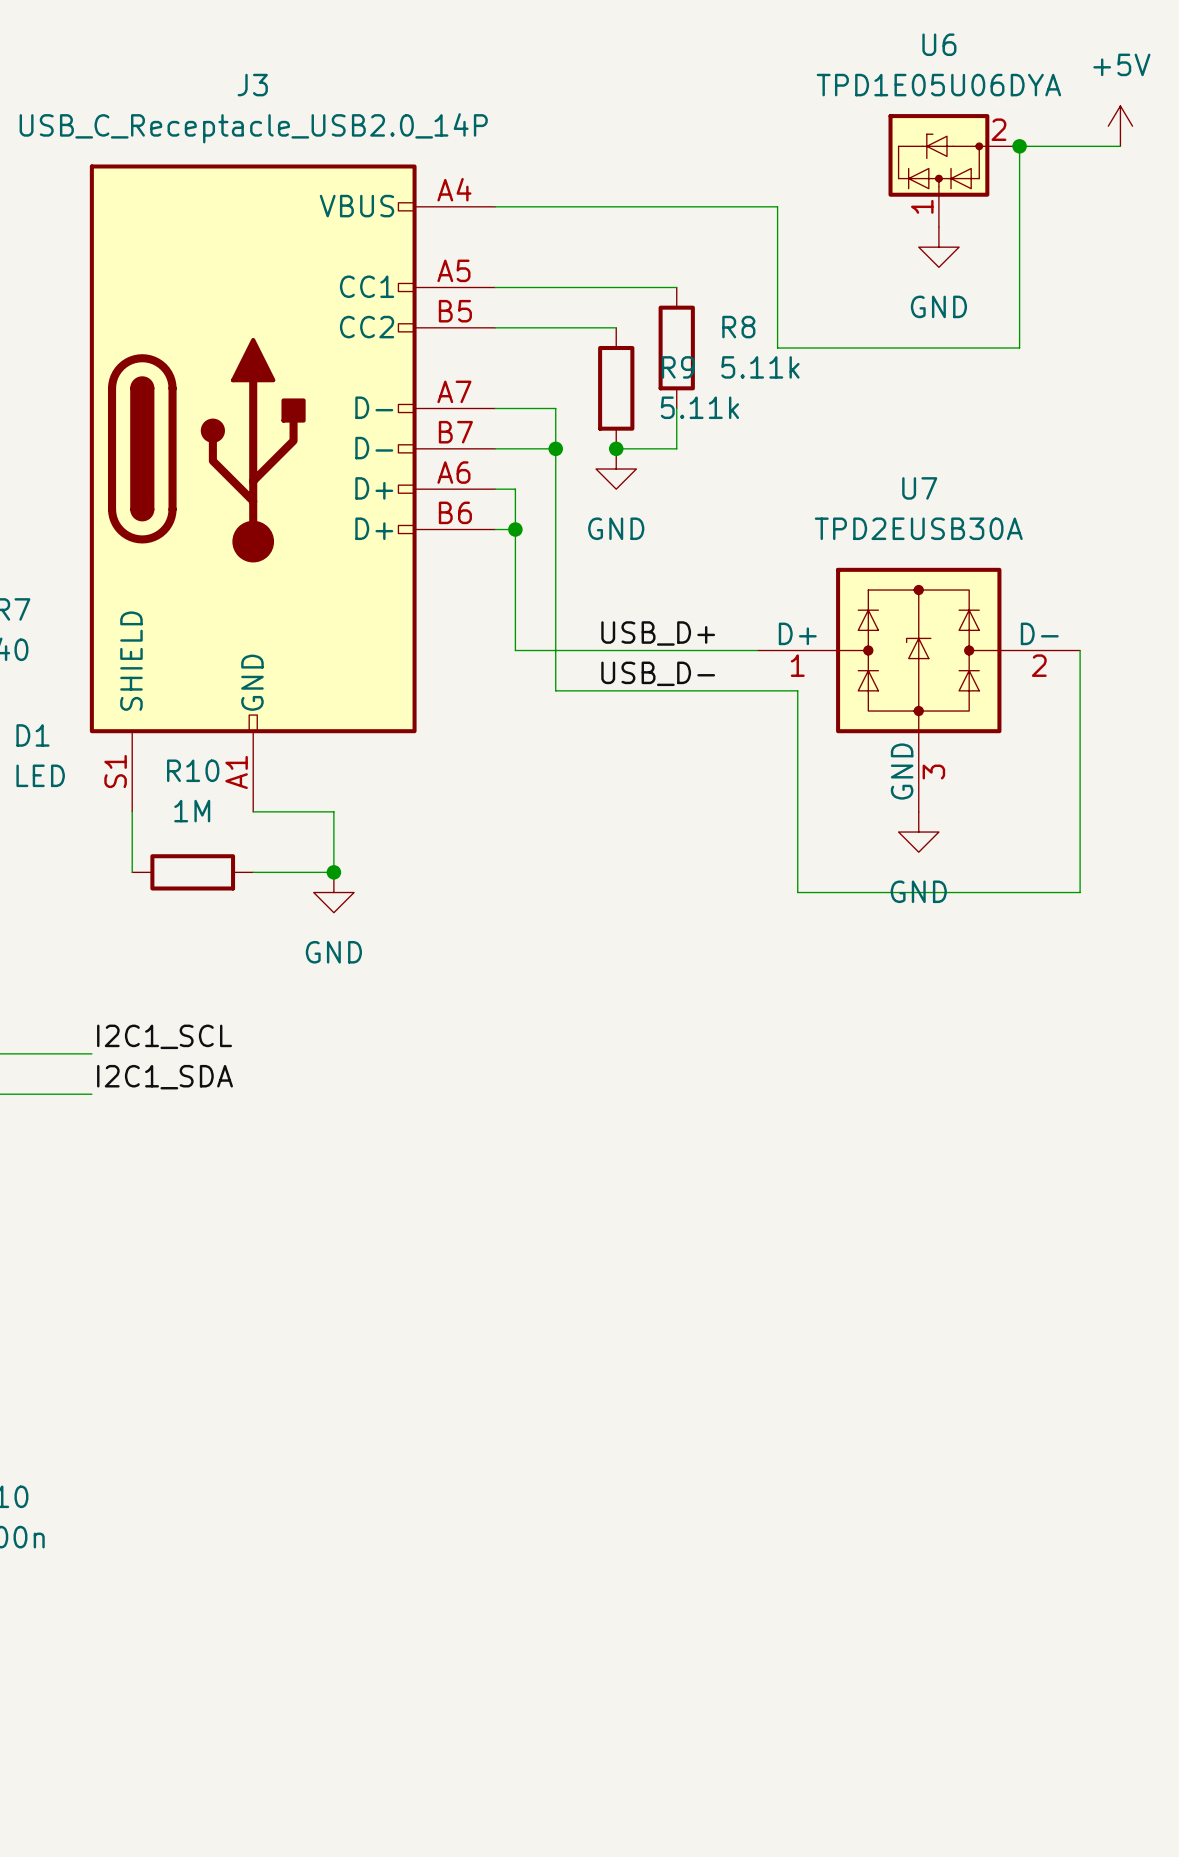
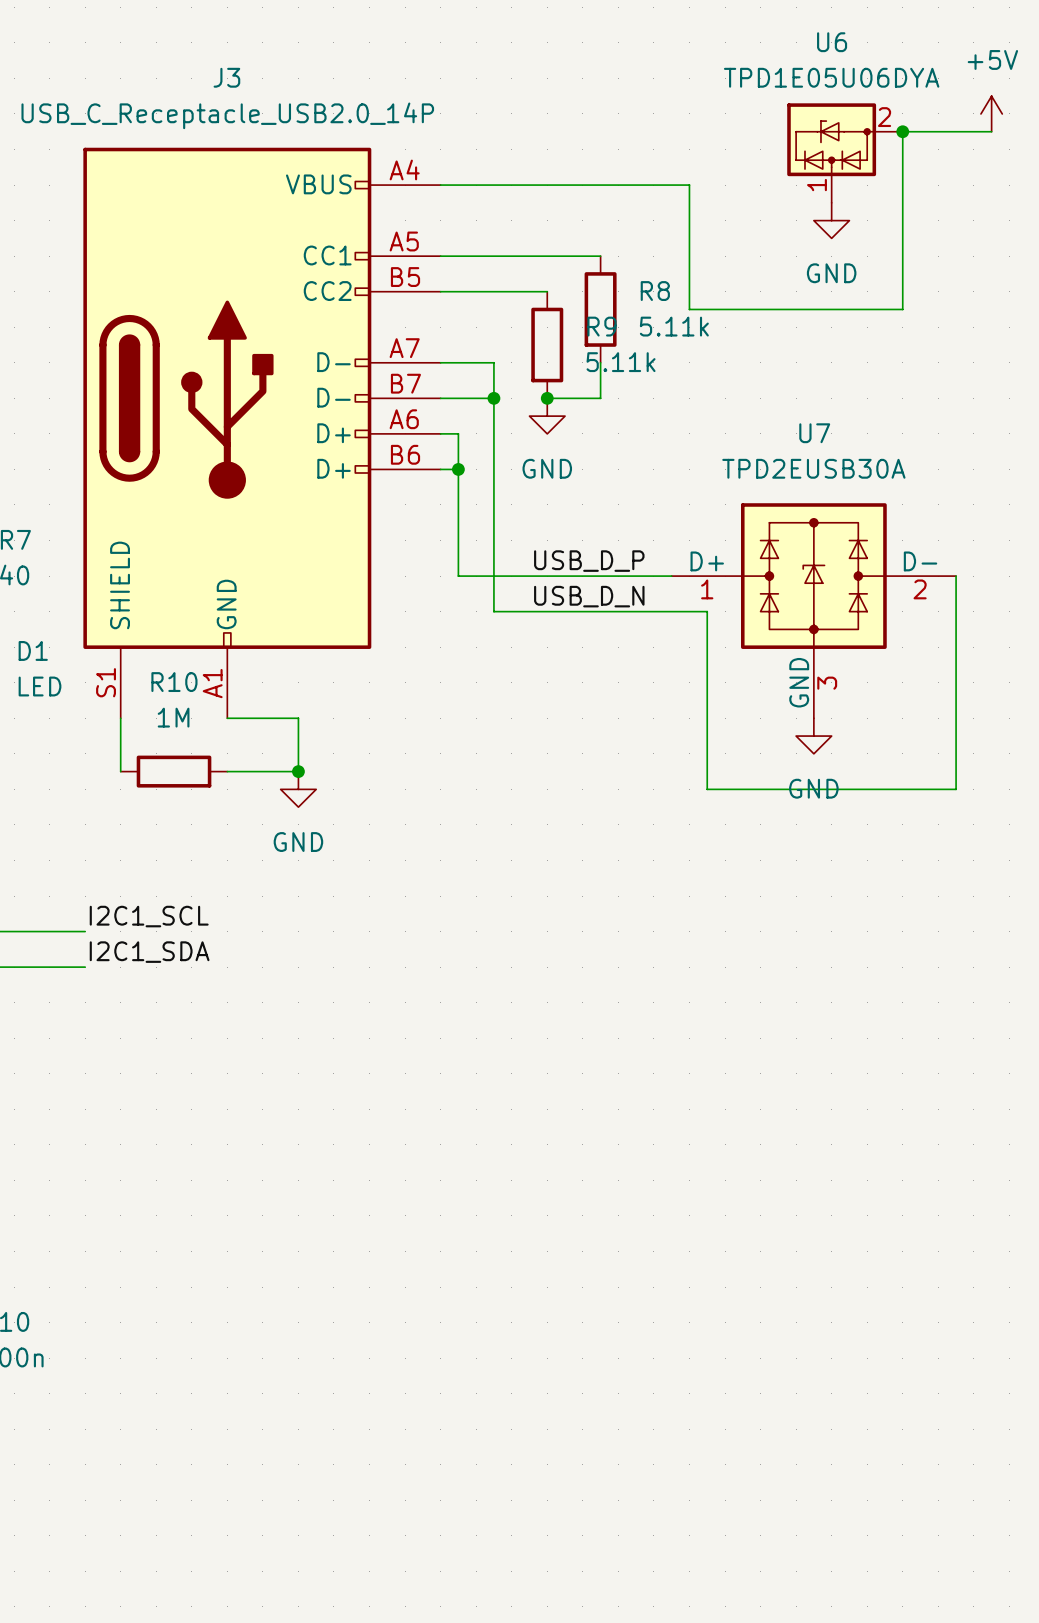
label: USB_D+ (658, 633) -> USB_D_P (589, 561)
label: USB_D- (658, 673) -> USB_D_N (589, 596)

